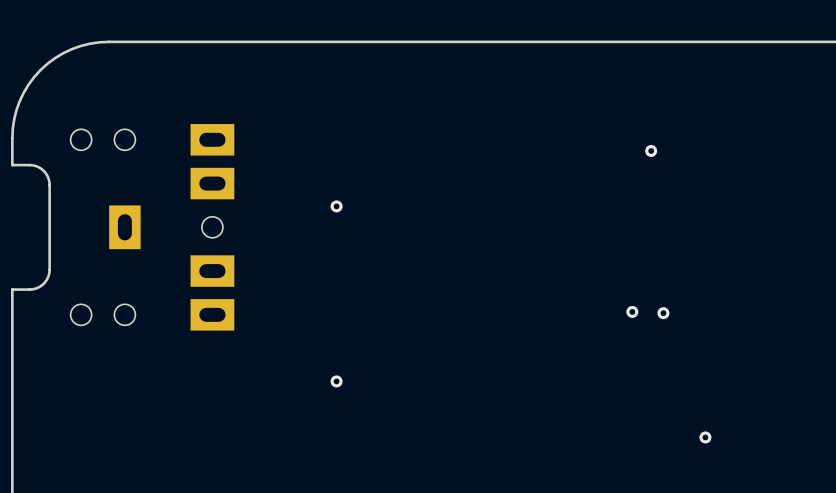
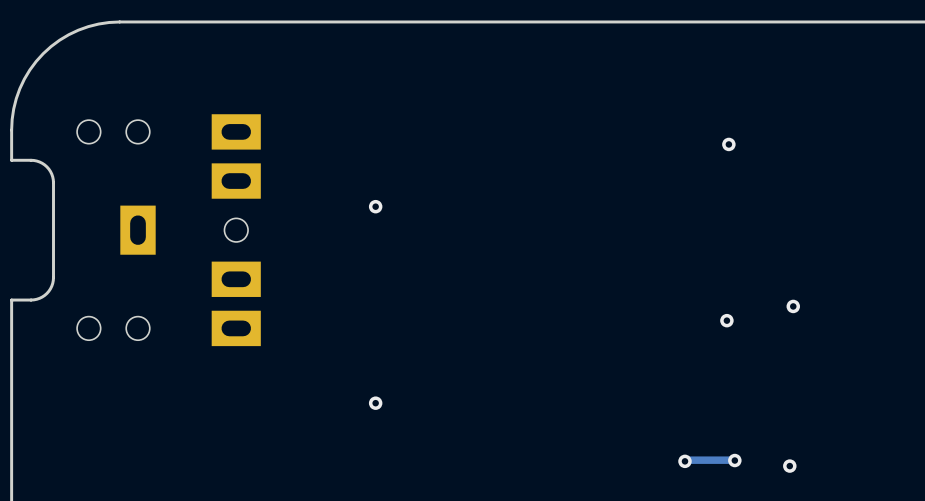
via: none -> (793, 306)
via: none -> (726, 320)
via: (632, 311) -> none
via: (663, 313) -> none
track: none -> (734, 460) (684, 461)
via: none -> (734, 460)
via: none -> (684, 461)

